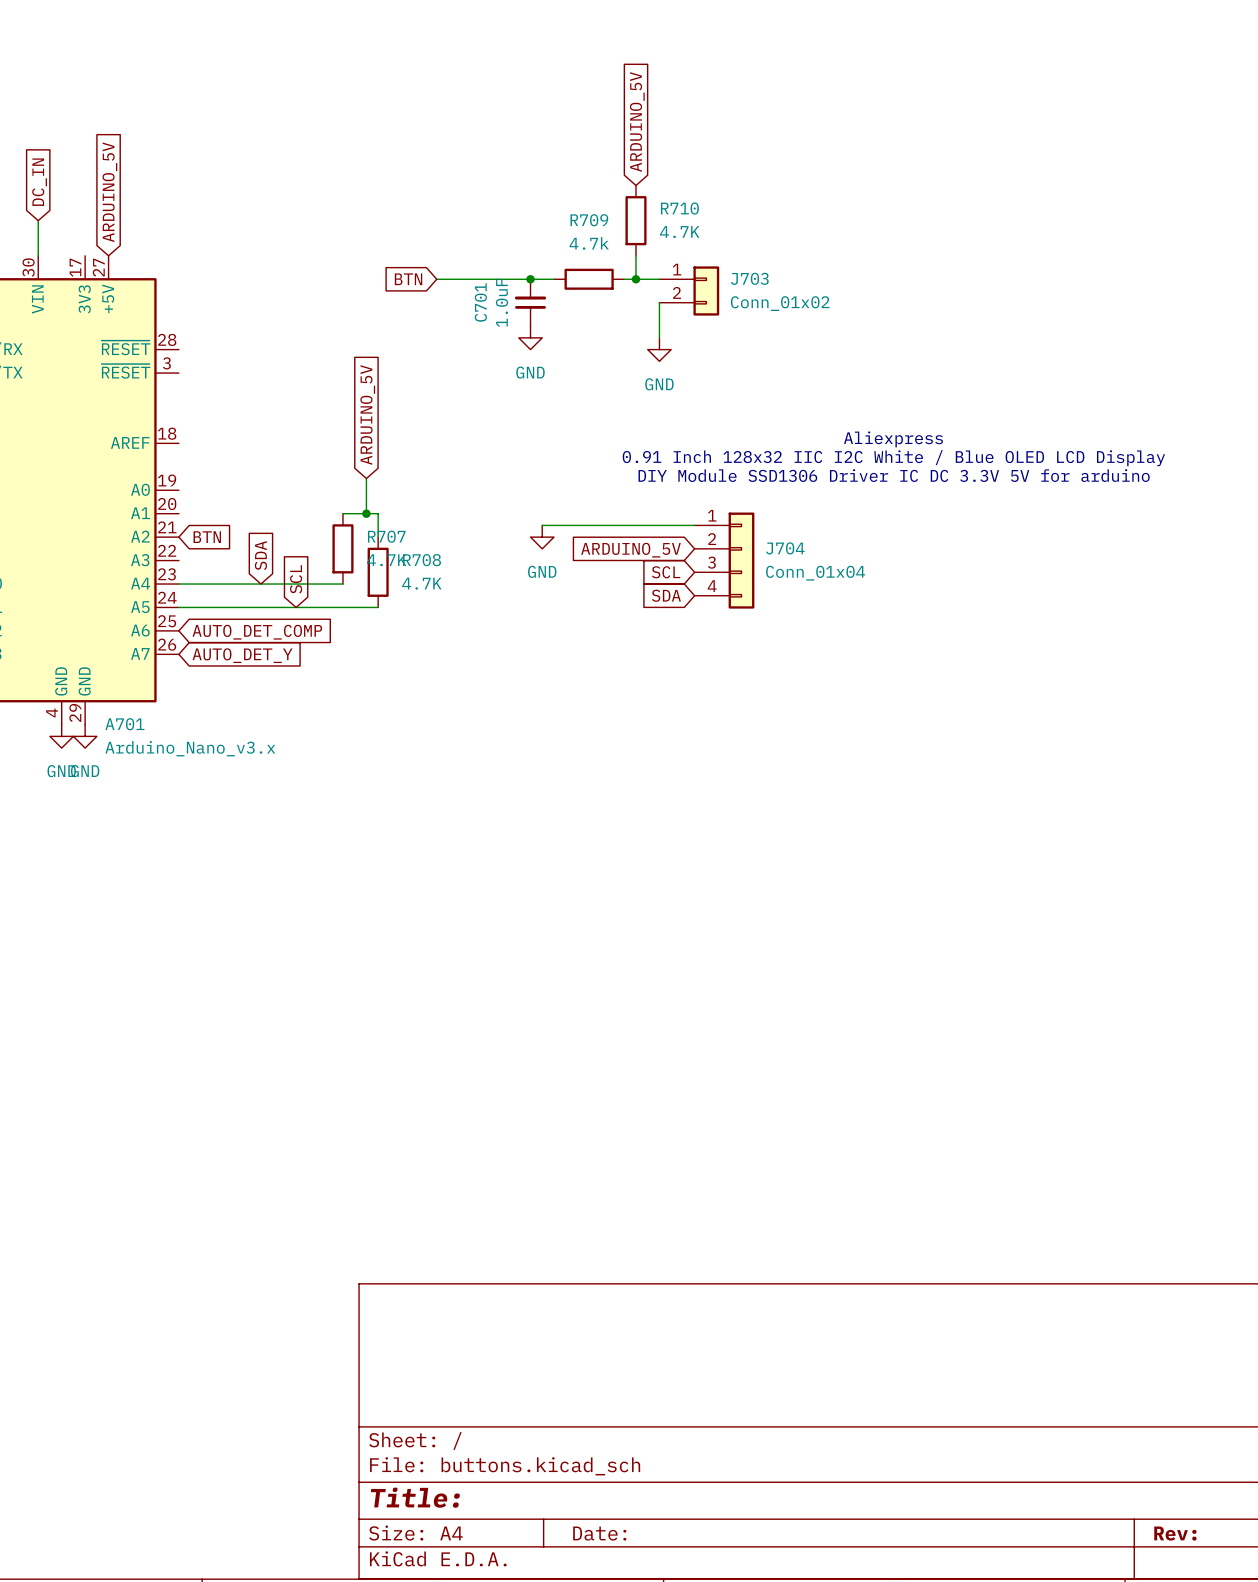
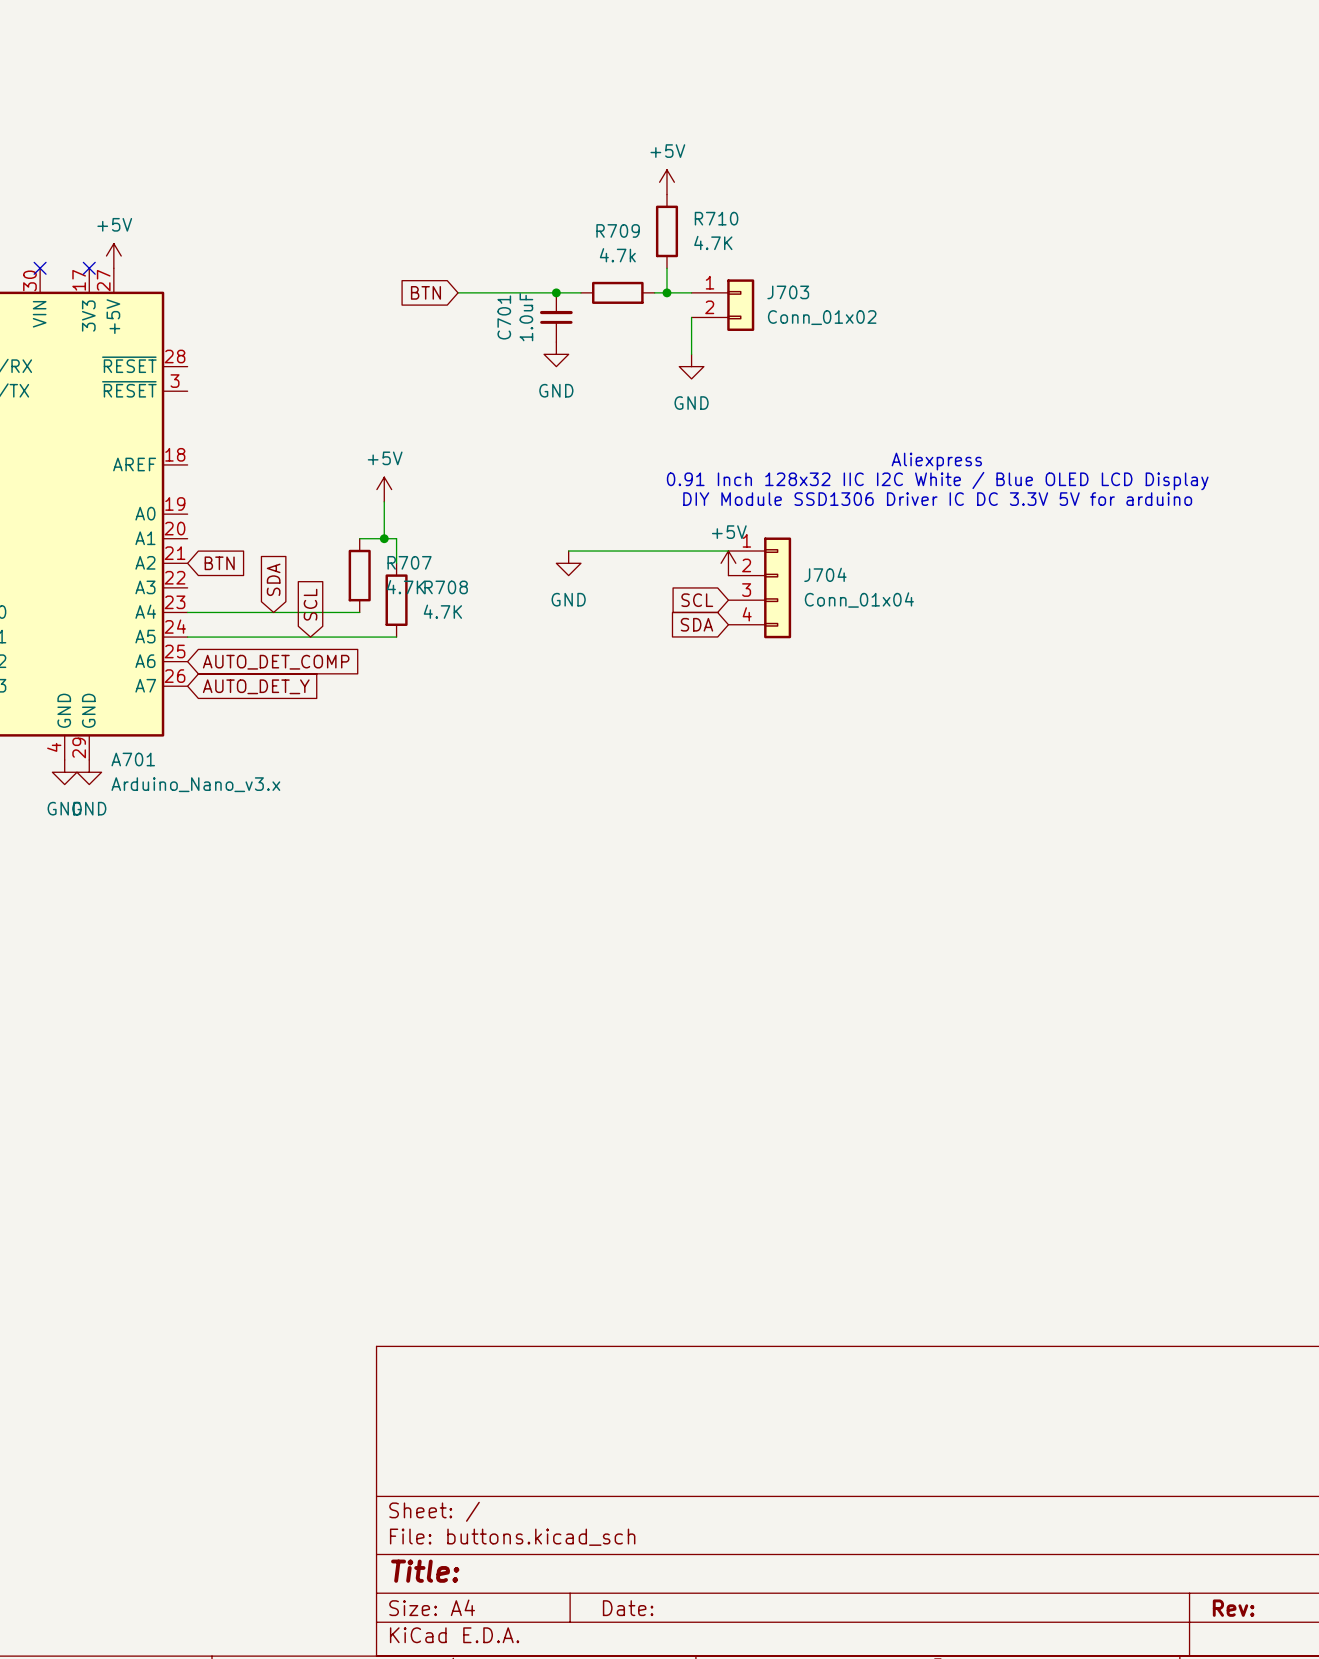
global label: ARDUINO_5V (637, 121) -> none
power symbol: none -> +5V (666, 182)
global label: DC_IN (39, 182) -> none
global label: ARDUINO_5V (109, 192) -> none
wire: (38, 220) (38, 255) -> none
power symbol: none -> +5V (113, 256)
no-connect mark: none -> (40, 268)
no-connect mark: none -> (89, 268)
global label: ARDUINO_5V (367, 415) -> none
power symbol: none -> +5V (384, 489)
power symbol: none -> +5V (728, 563)
global label: ARDUINO_5V (631, 550) -> none

